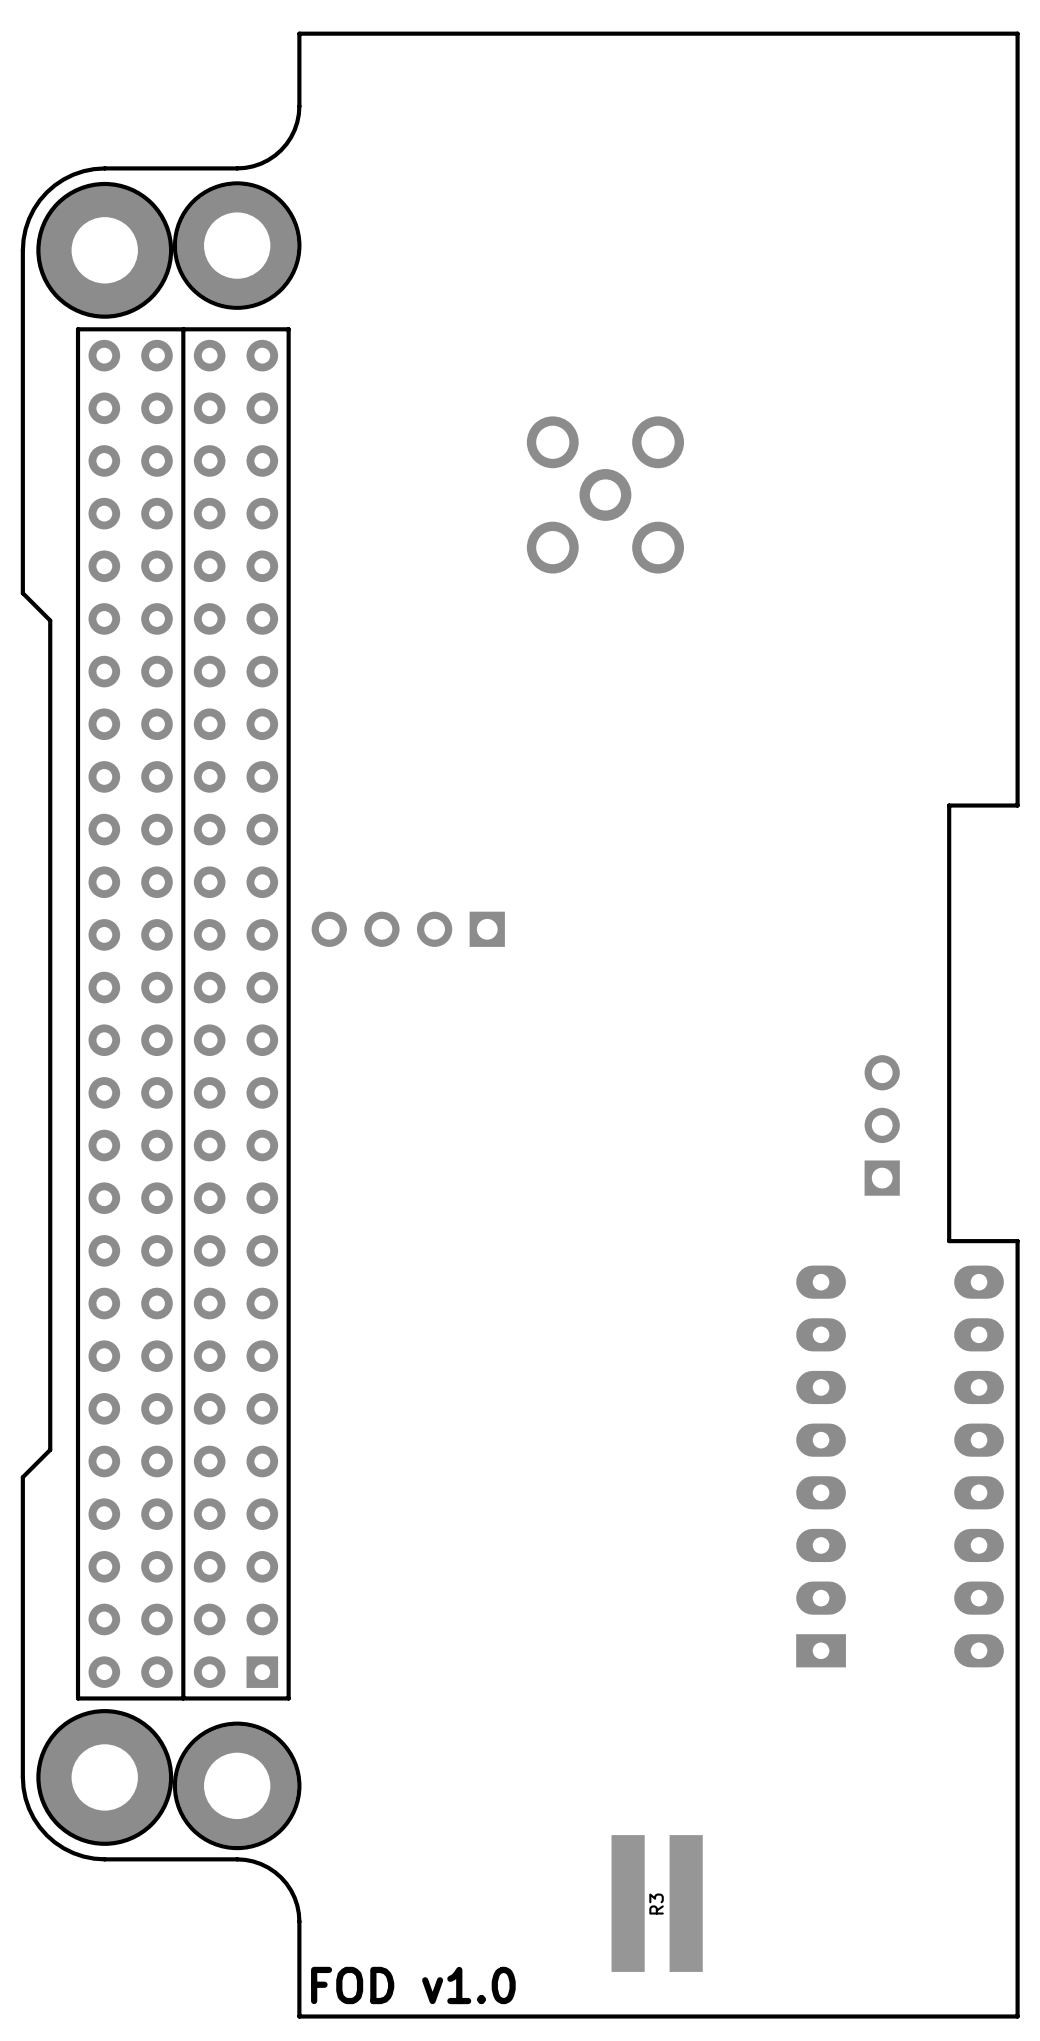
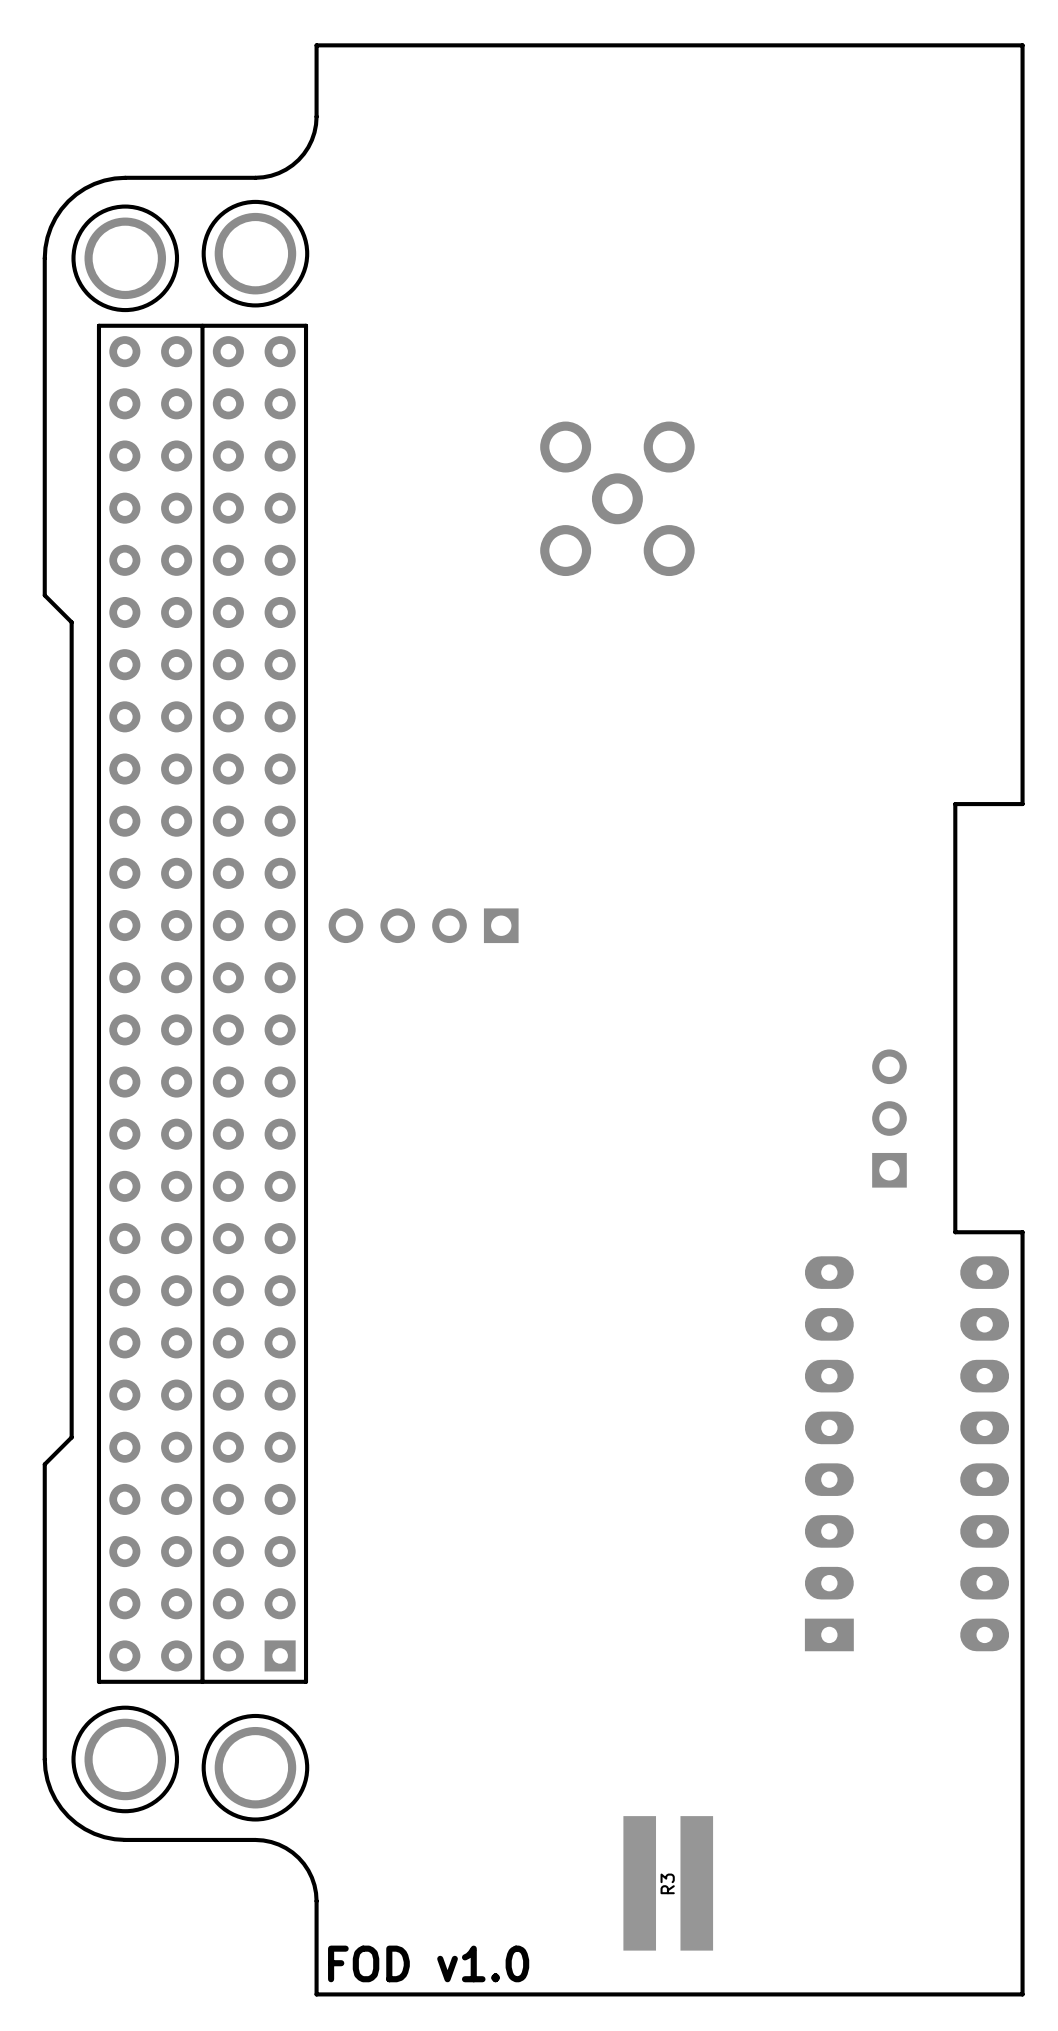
part footprint: [20, 31, 1020, 2019] -> [42, 43, 1025, 1997]

